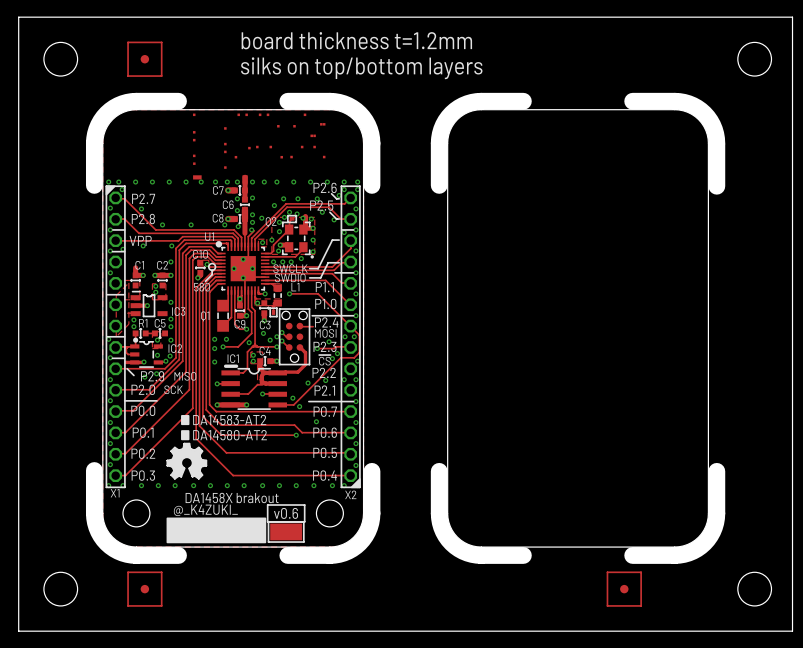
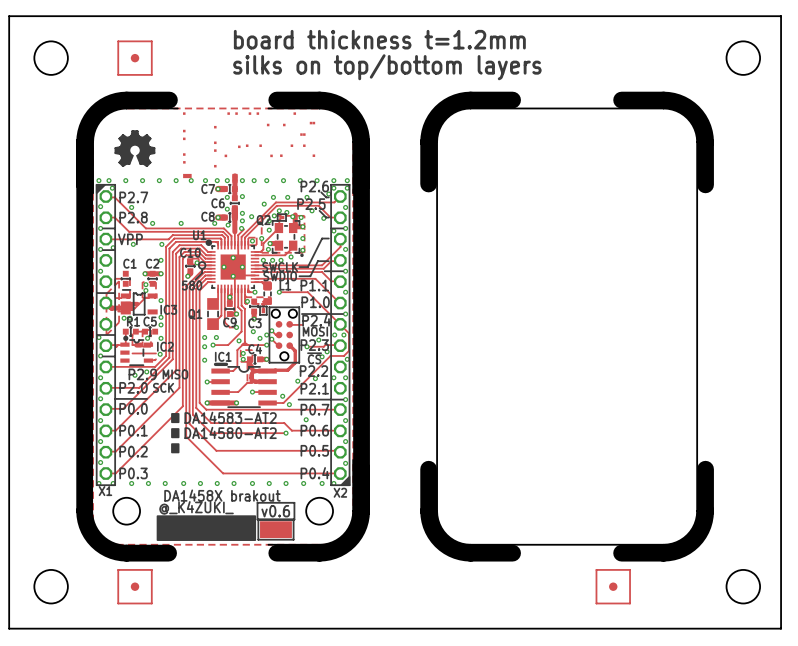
drawing: none -> [76, 91, 178, 194]
drawing: none -> [268, 91, 370, 194]
board edge: (178, 101) (131, 101) (118, 105) (110, 110) (100, 120) (96, 129) (94, 143) -> none
board edge: (287, 101) (334, 101) (348, 105) (356, 110) (365, 120) (369, 129) (371, 143) -> none
board edge: (136, 109) (334, 109) (350, 116) (360, 130) (363, 143) (363, 513) (359, 530) (350, 540) (342, 544) (329, 547) (132, 546) (115, 540) (105, 526) (102, 513) (103, 138) (107, 126) (112, 119) (123, 112) (136, 109) -> none
board edge: none -> (84, 183) (84, 468)
board edge: none -> (361, 183) (361, 469)
track: (135, 267) (135, 275) (143, 275) -> none
via: (143, 275) -> none
track: none -> (148, 297) (145, 297) (134, 308) (111, 308) (105, 303)
via: (147, 305) -> none
via: none -> (129, 318)
via: (133, 326) -> none
track: none -> (131, 334) (132, 345) (140, 345)
track: (126, 346) (128, 354) (134, 354) -> none
track: none -> (132, 353) (155, 353)
via: (157, 355) -> none
via: (165, 361) -> none
track: (144, 362) (126, 362) (144, 362) -> none
via: (144, 362) -> none
line: (127, 368) (133, 375) -> none
drawing: [166, 442, 208, 480] -> none
drawing: none -> [171, 443, 180, 454]
part: none -> (319, 510)
board edge: (371, 513) (369, 527) (365, 535) (356, 546) (348, 551) (334, 555) (287, 555) -> none

